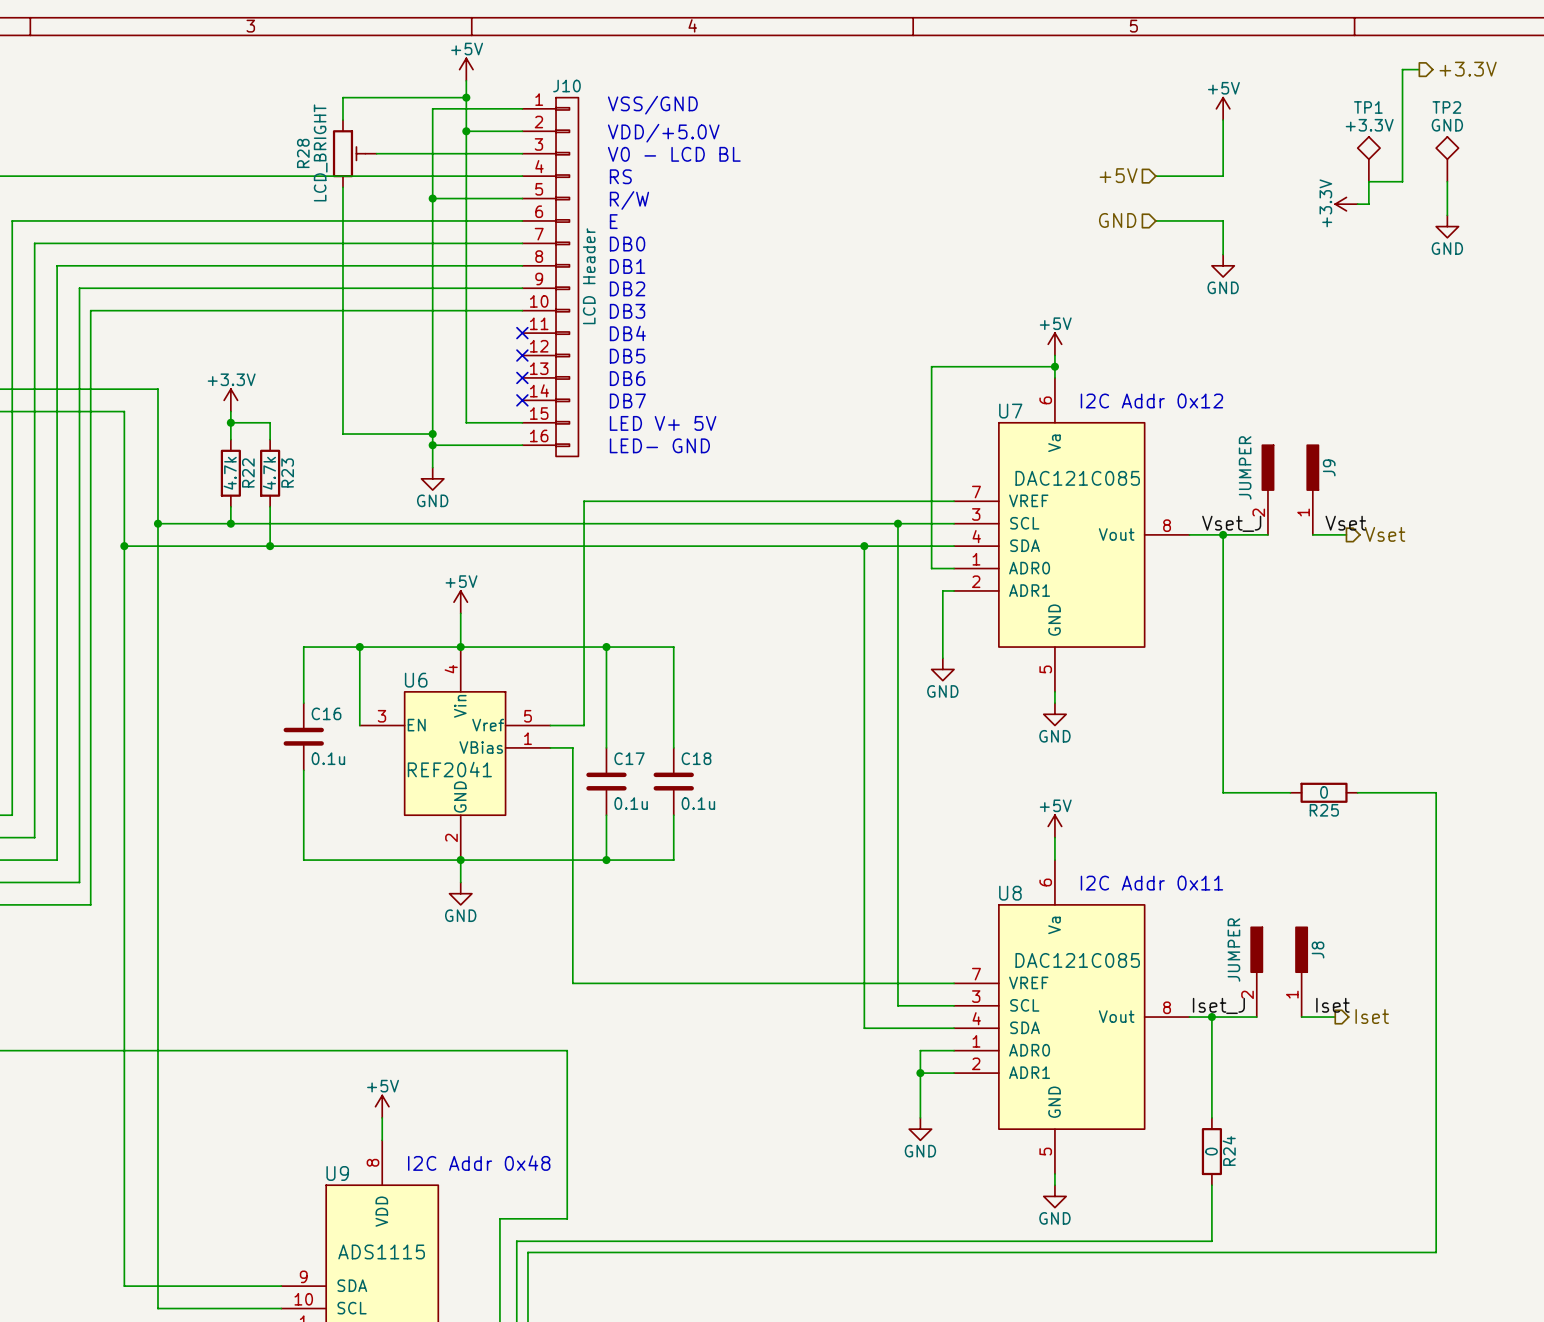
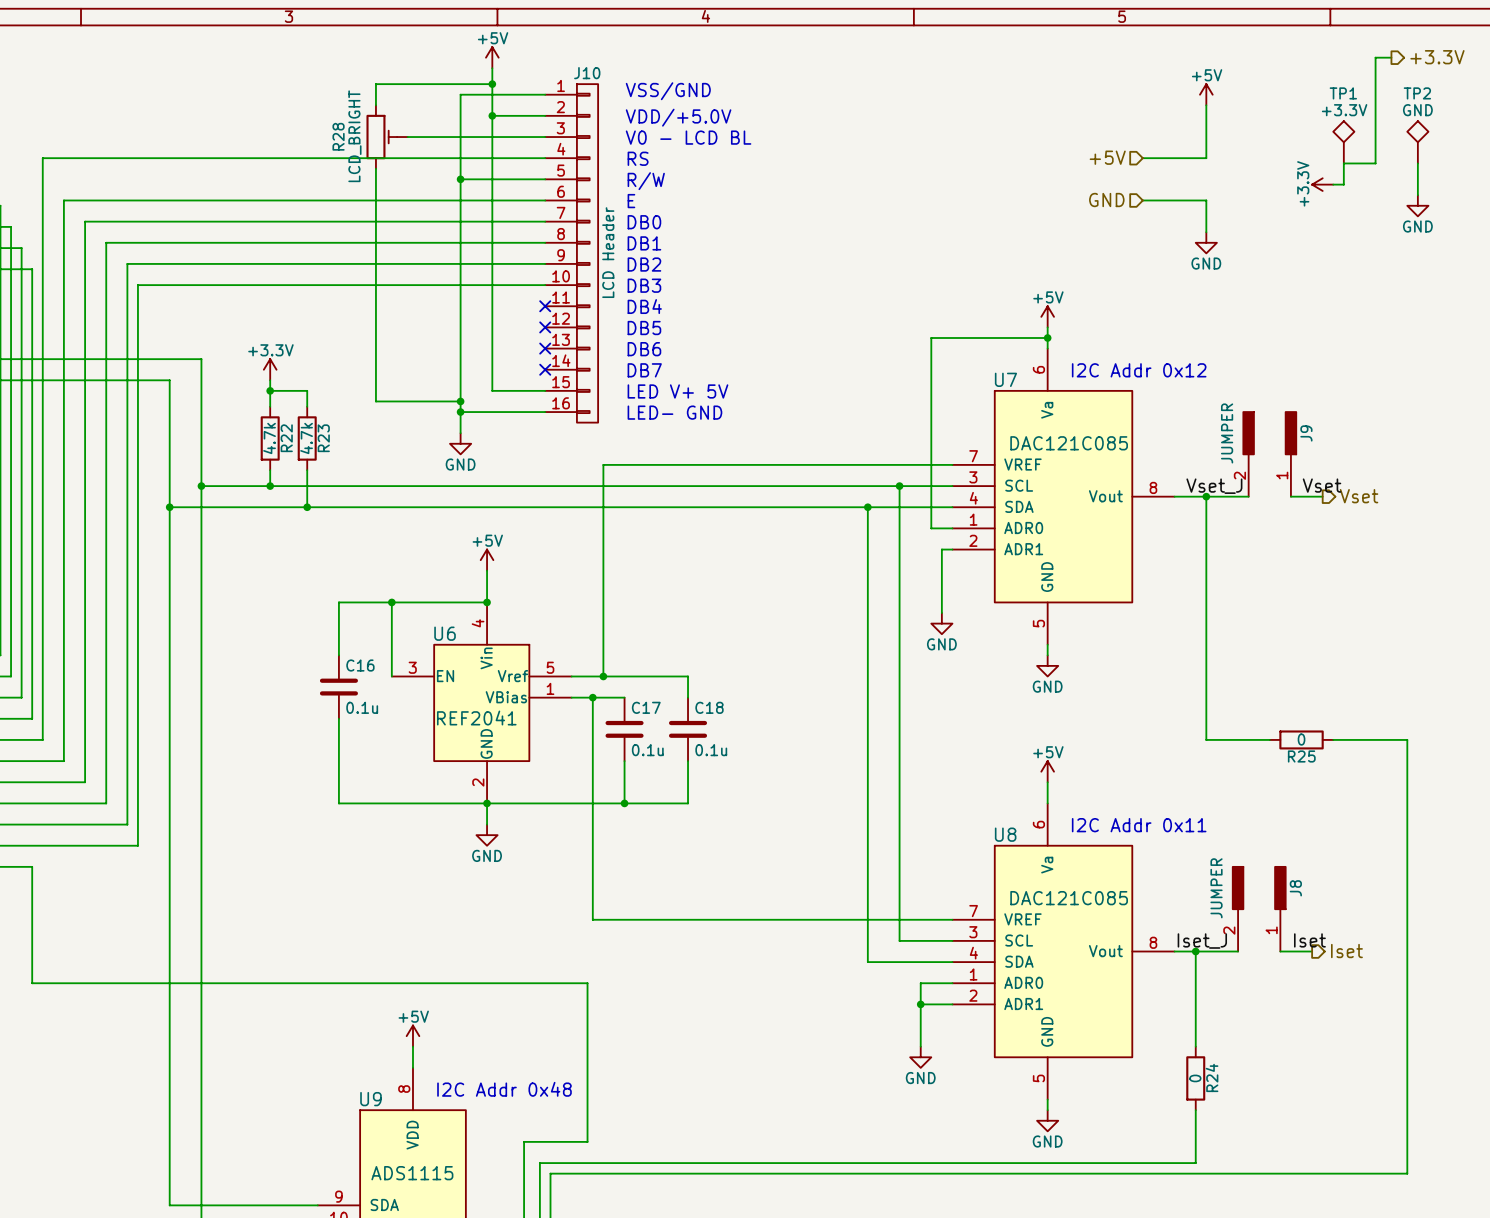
wire: (460, 647) (673, 647) (673, 725) -> (603, 676) (688, 676)
wire: (606, 647) (606, 747) -> (592, 697) (624, 697)
junction: (606, 647) -> none
junction: none -> (603, 676)
junction: none -> (592, 697)

